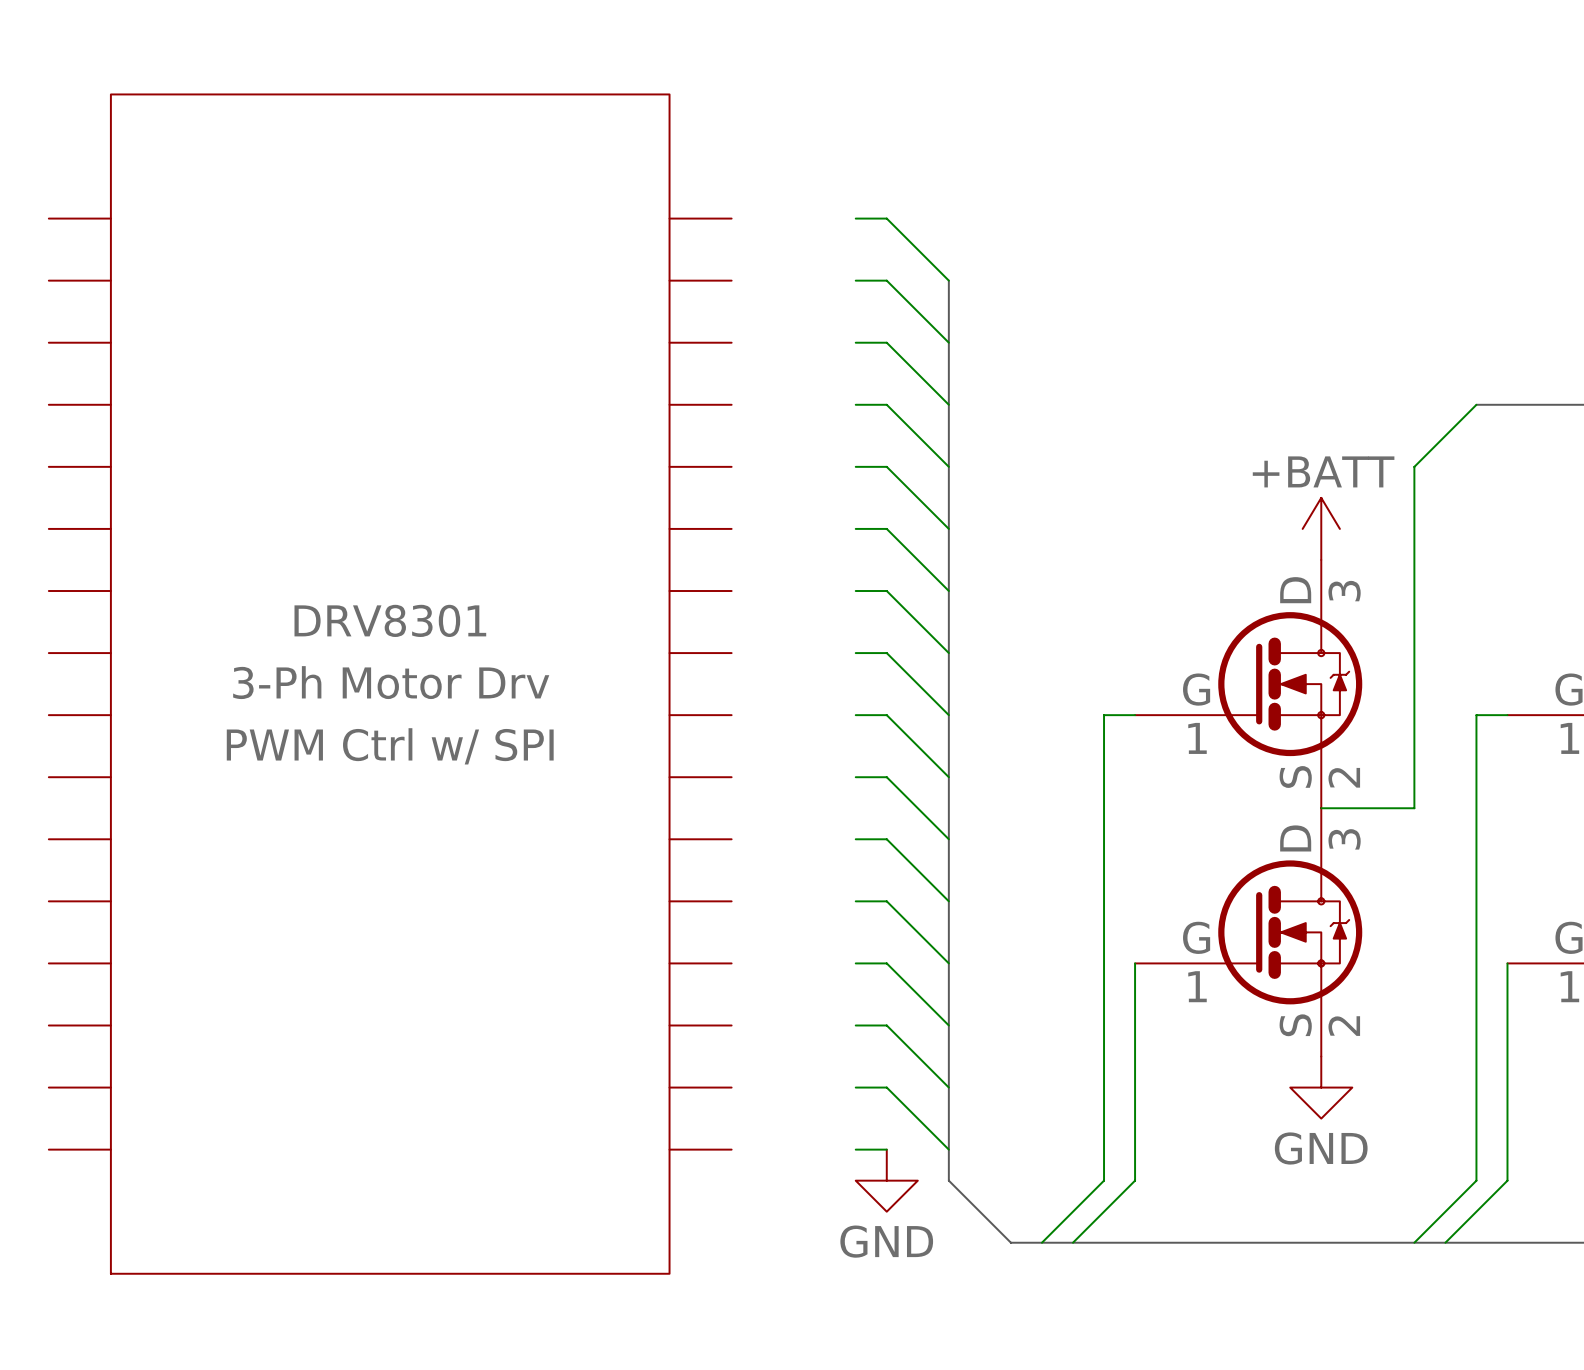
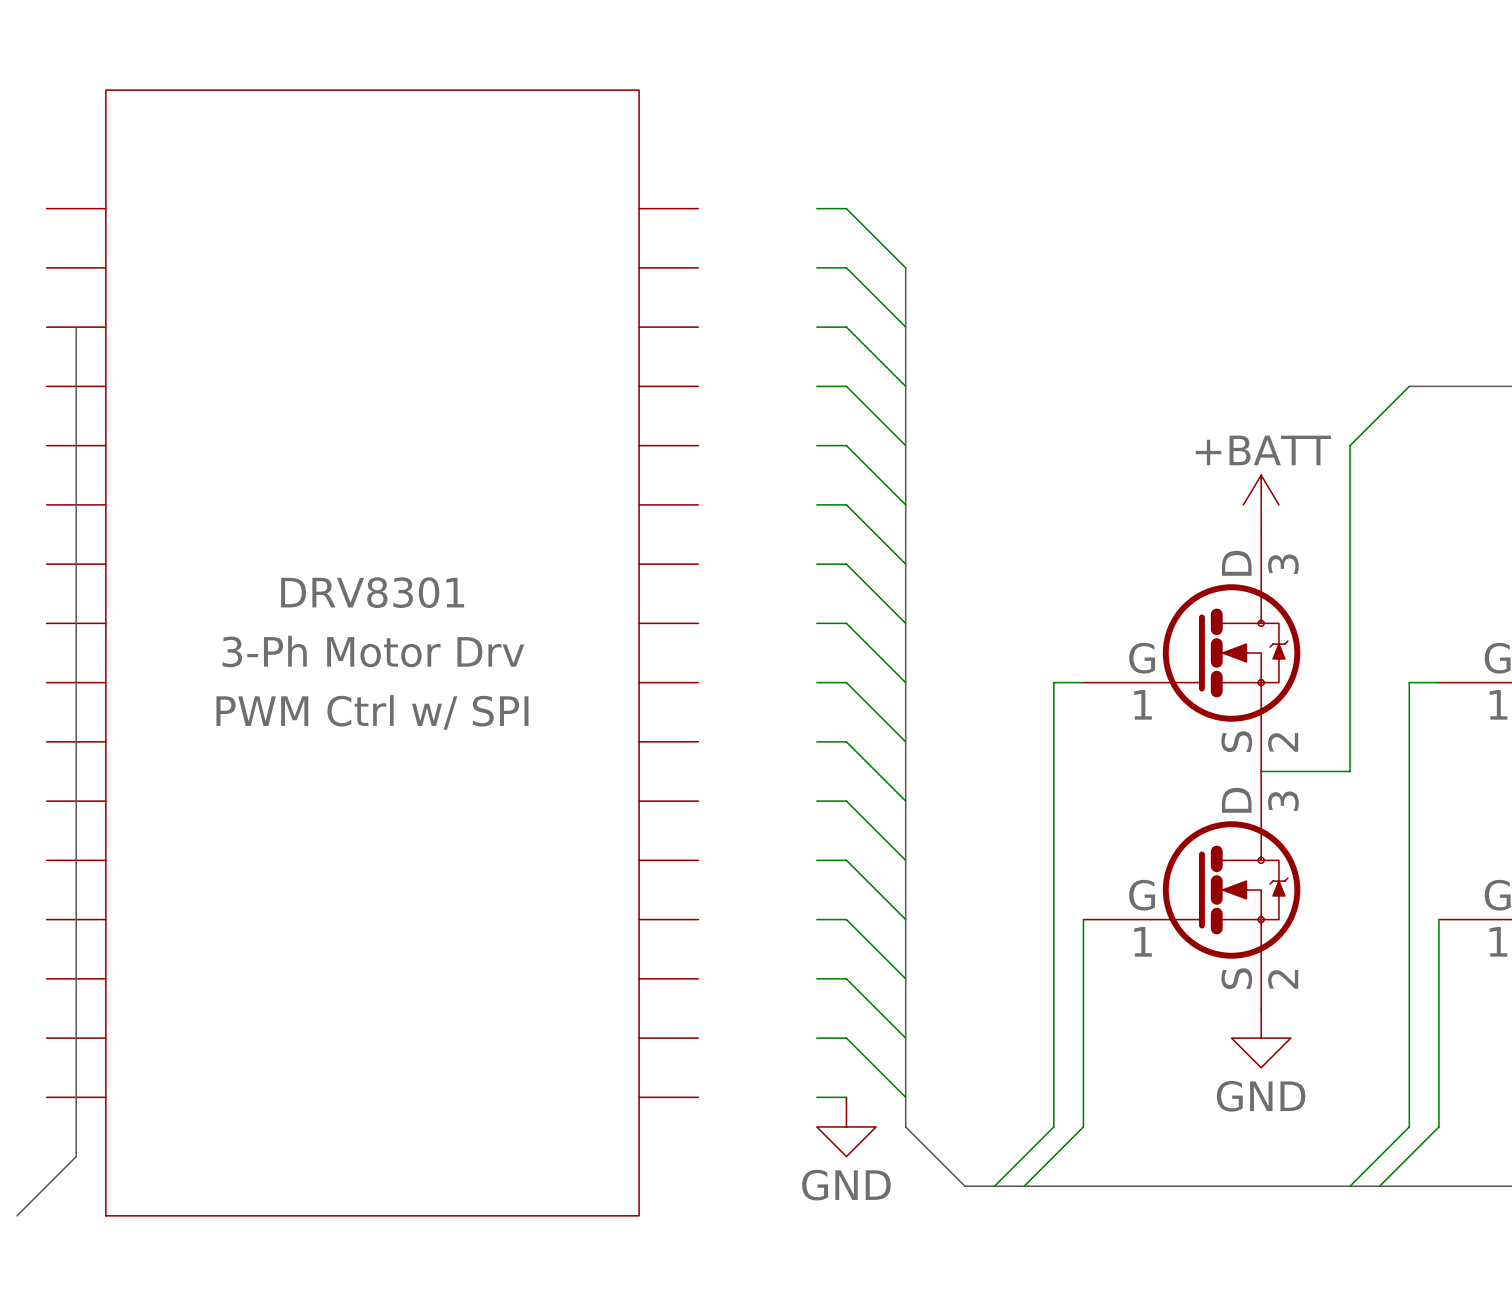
bus: none -> (76, 327) (76, 1156) (16, 1215)

